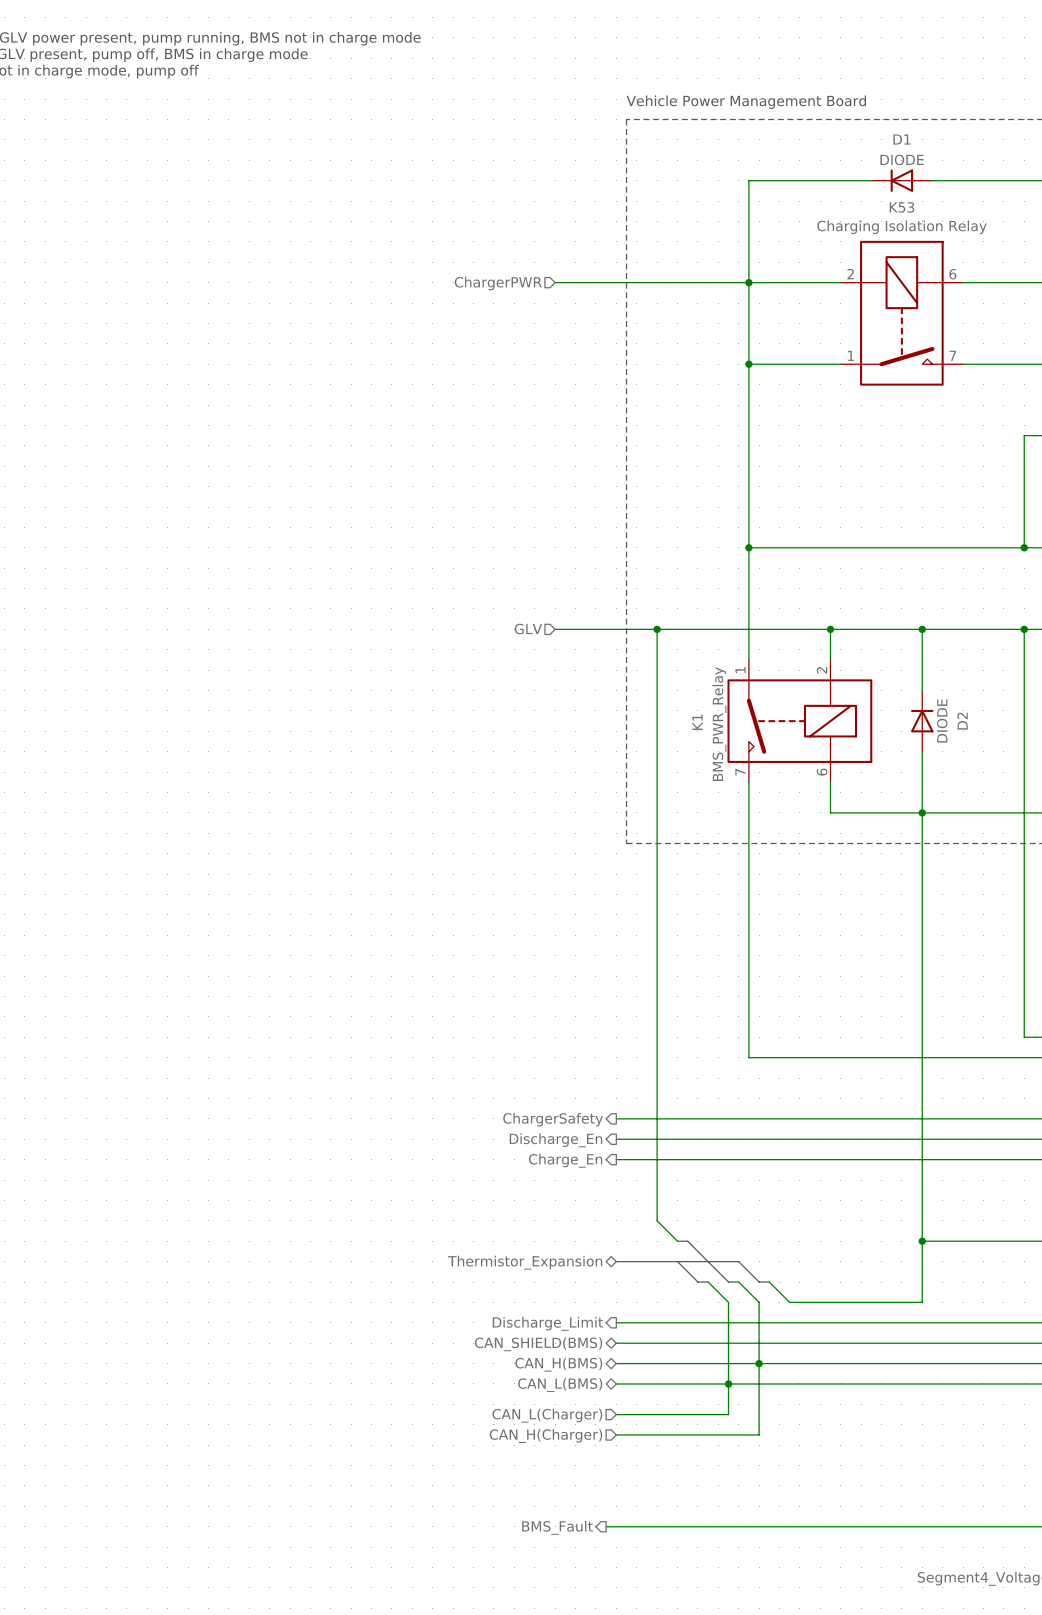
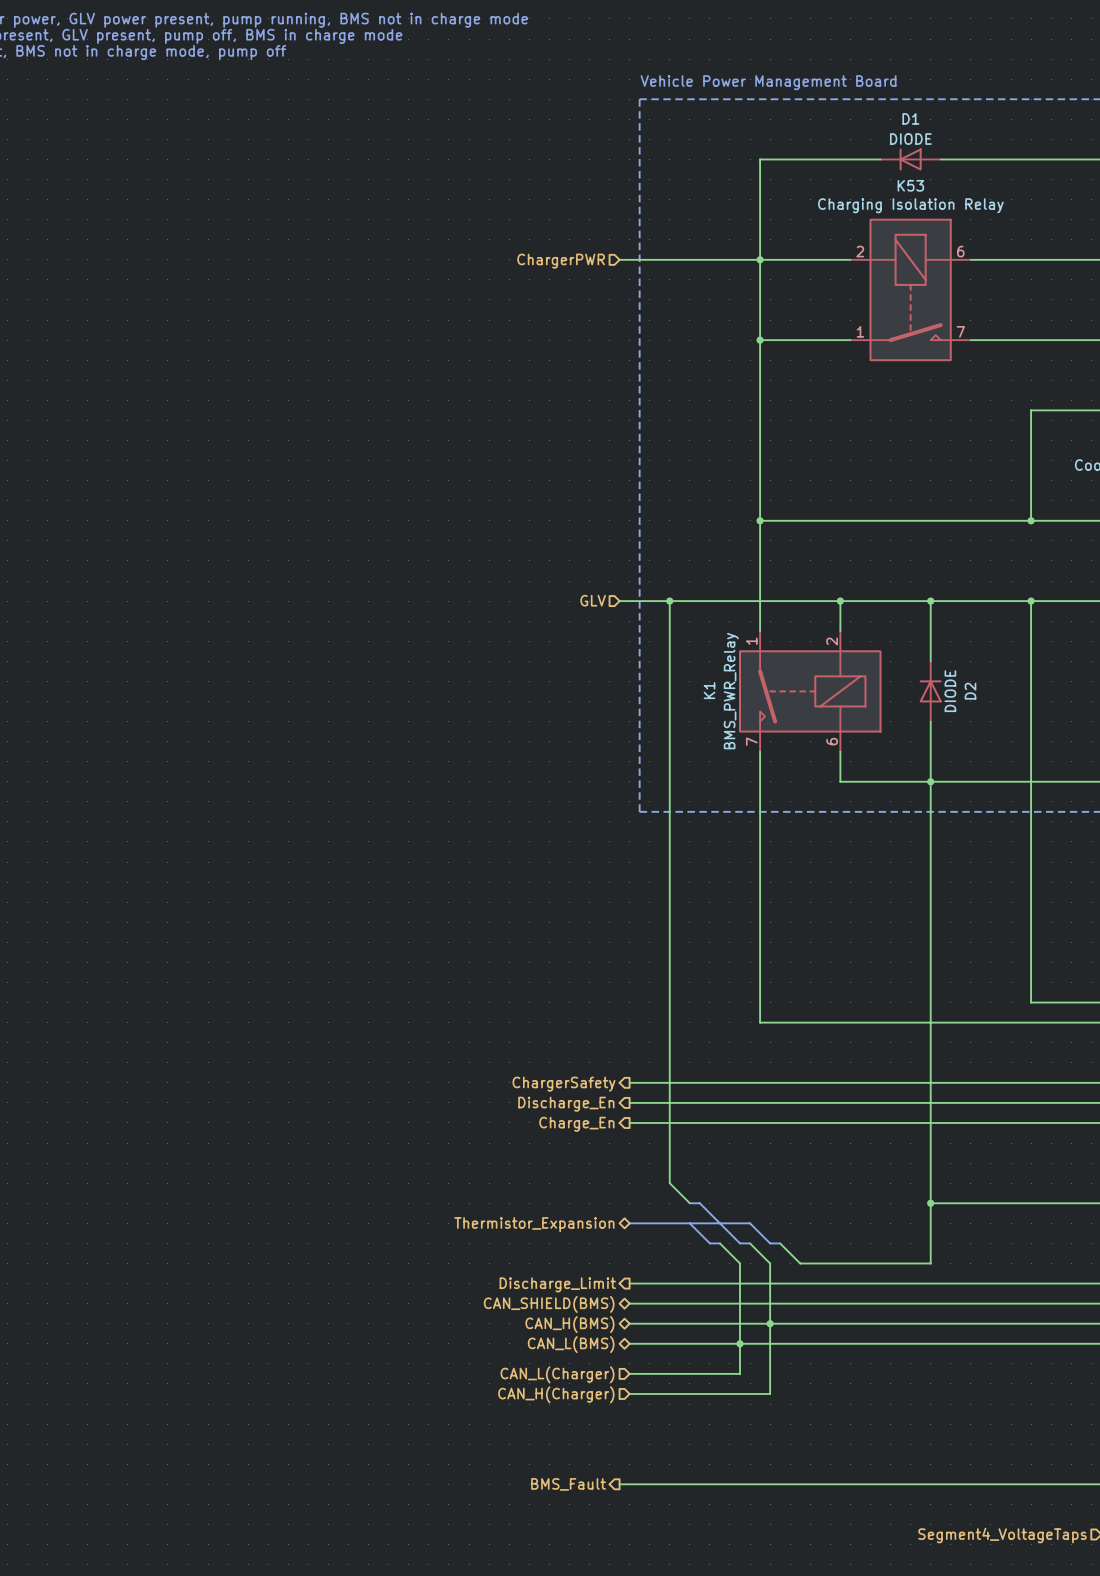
wire: (555, 282) (606, 282) -> none
hierarchical label position: ChargerPWR (498, 283) -> ChargerPWR (561, 261)
hierarchical label position: GLV (528, 629) -> GLV (593, 600)
wire: (555, 629) (606, 629) -> none

